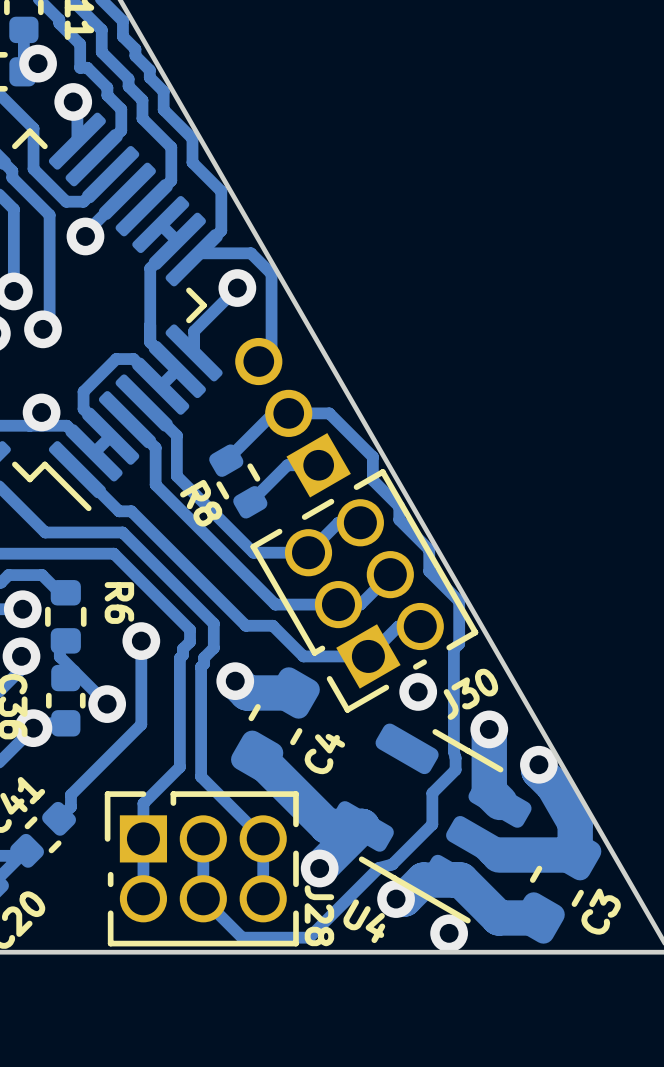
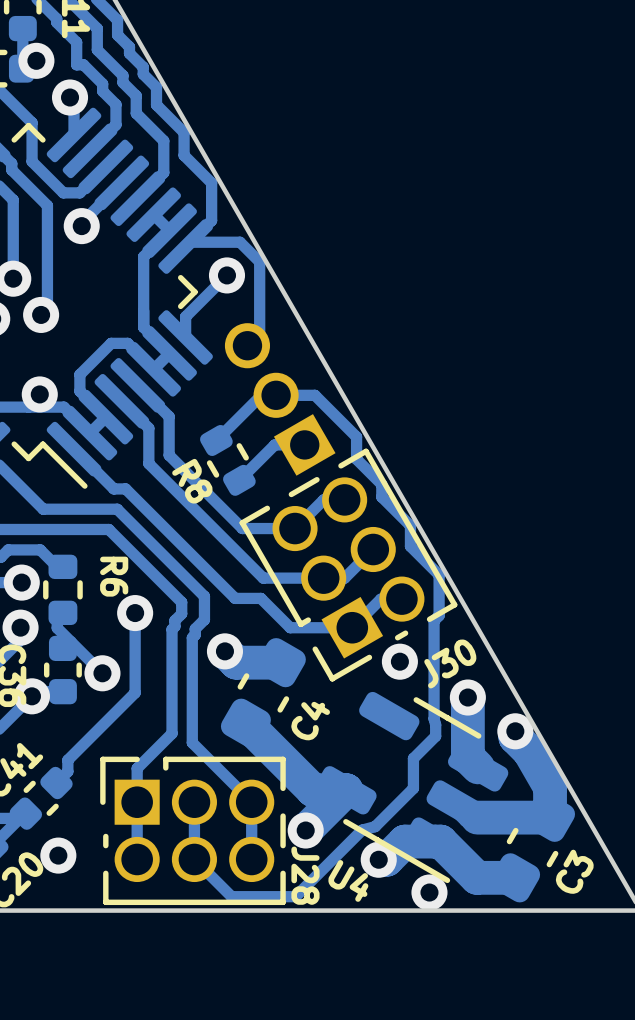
via: none -> (58, 855)

